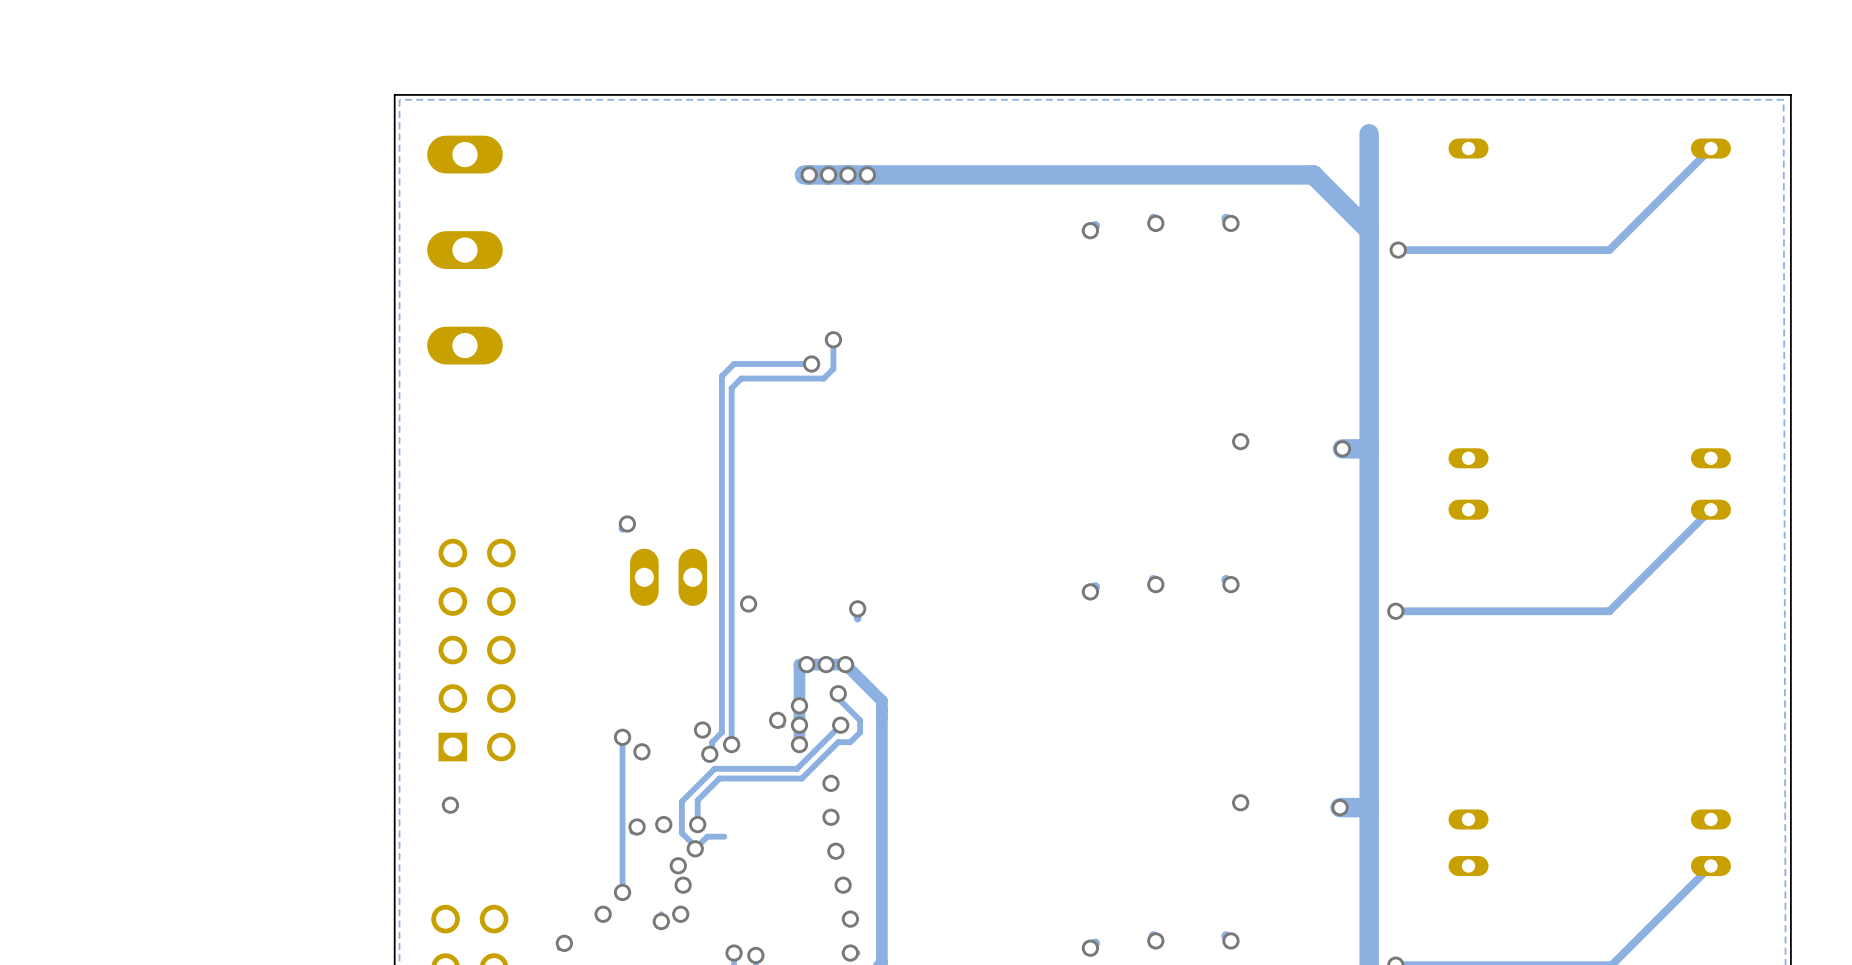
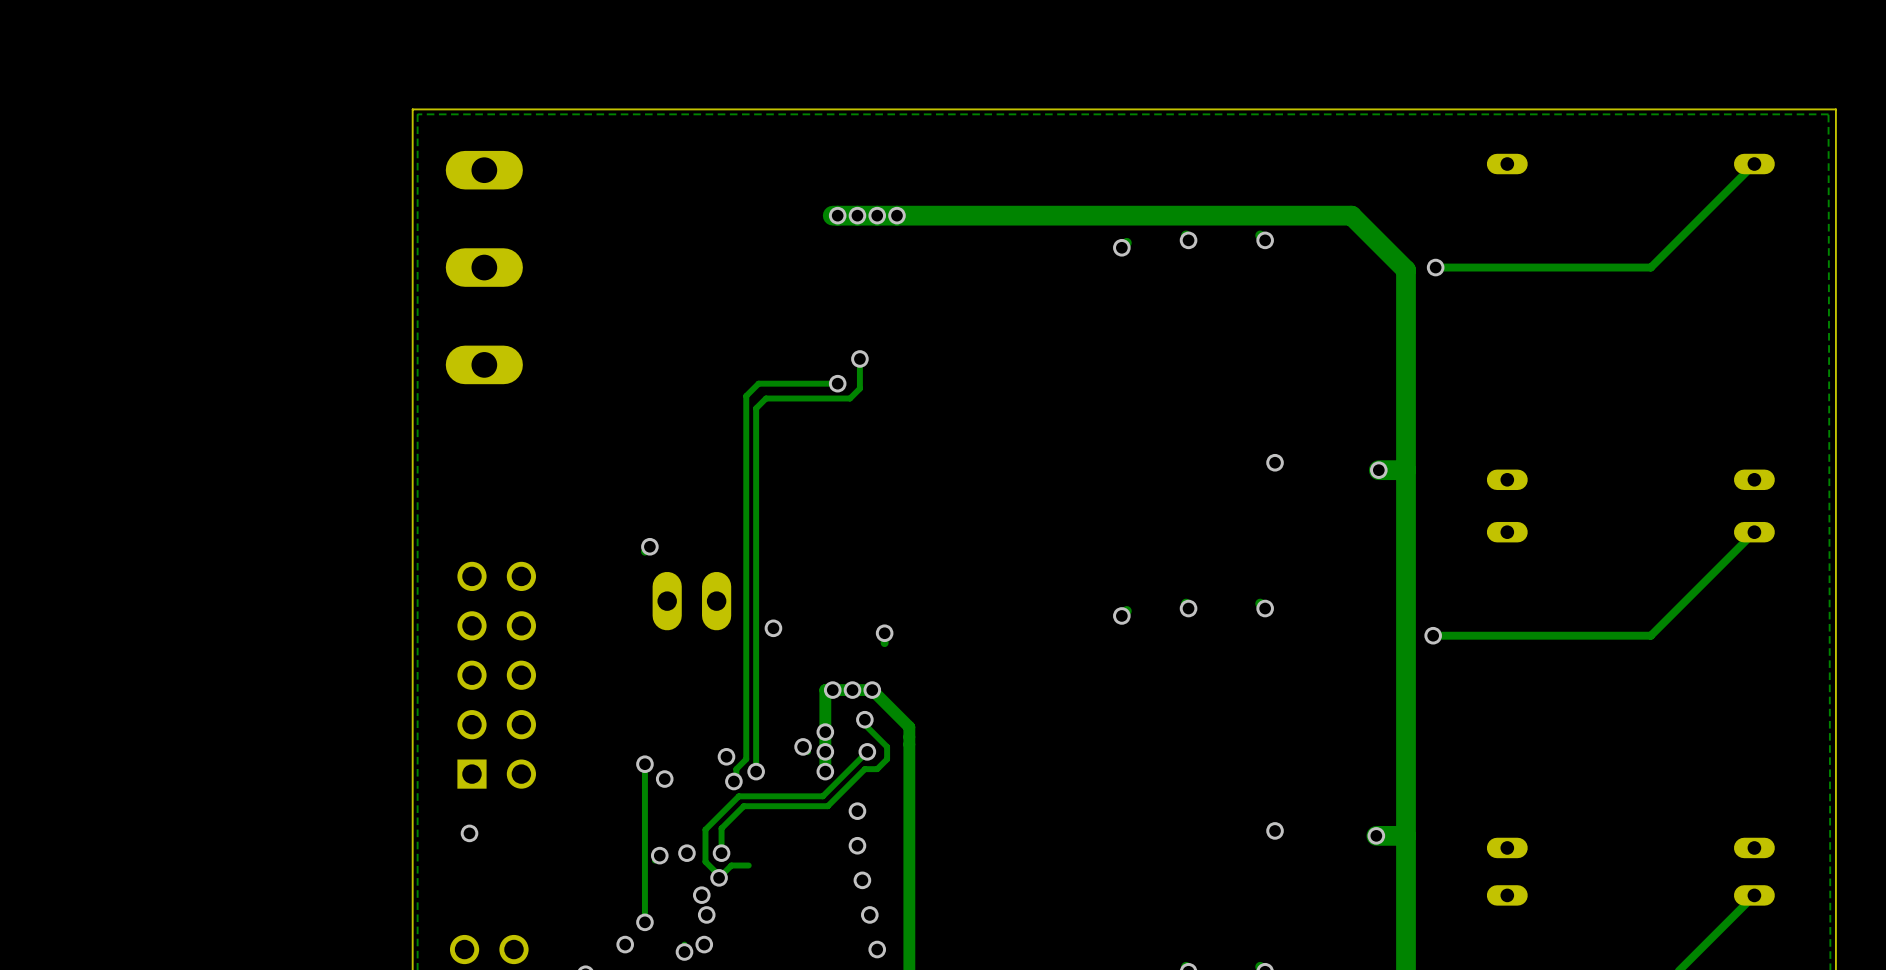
track: (1369, 133) (1369, 252) -> (832, 215) (1351, 215) (1406, 270)
track: (804, 174) (1313, 174) (1369, 230) -> none
via: (809, 174) -> none
via: (828, 174) -> none
via: (847, 174) -> none
via: (867, 174) -> none
via: none -> (837, 215)
via: none -> (857, 215)
via: none -> (877, 215)
via: none -> (896, 215)

